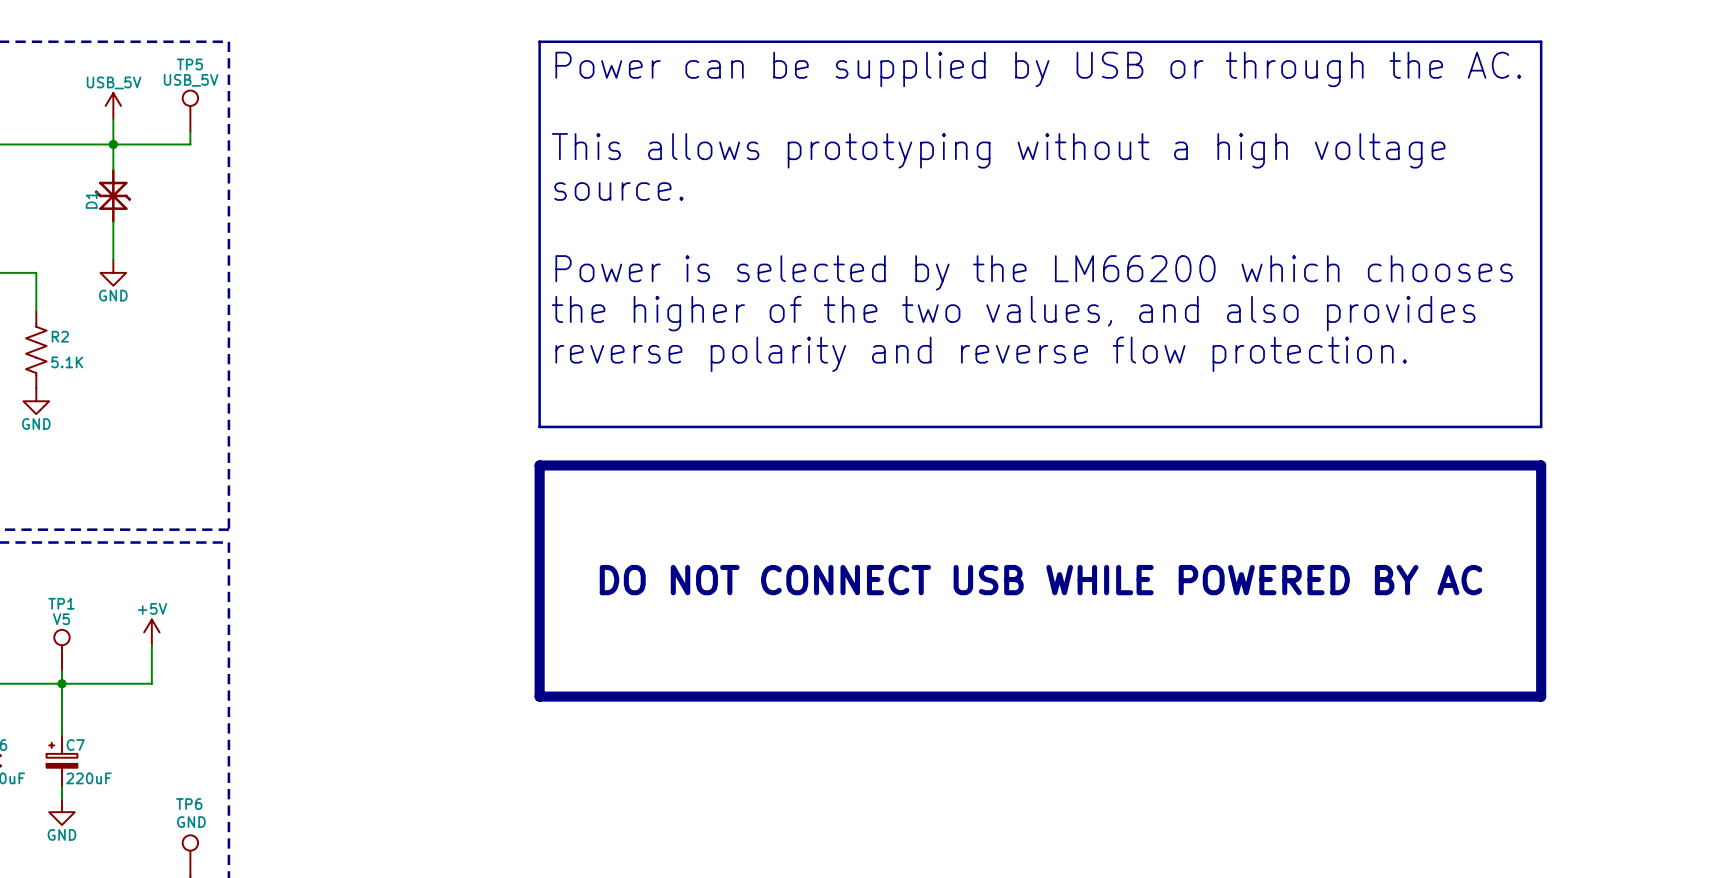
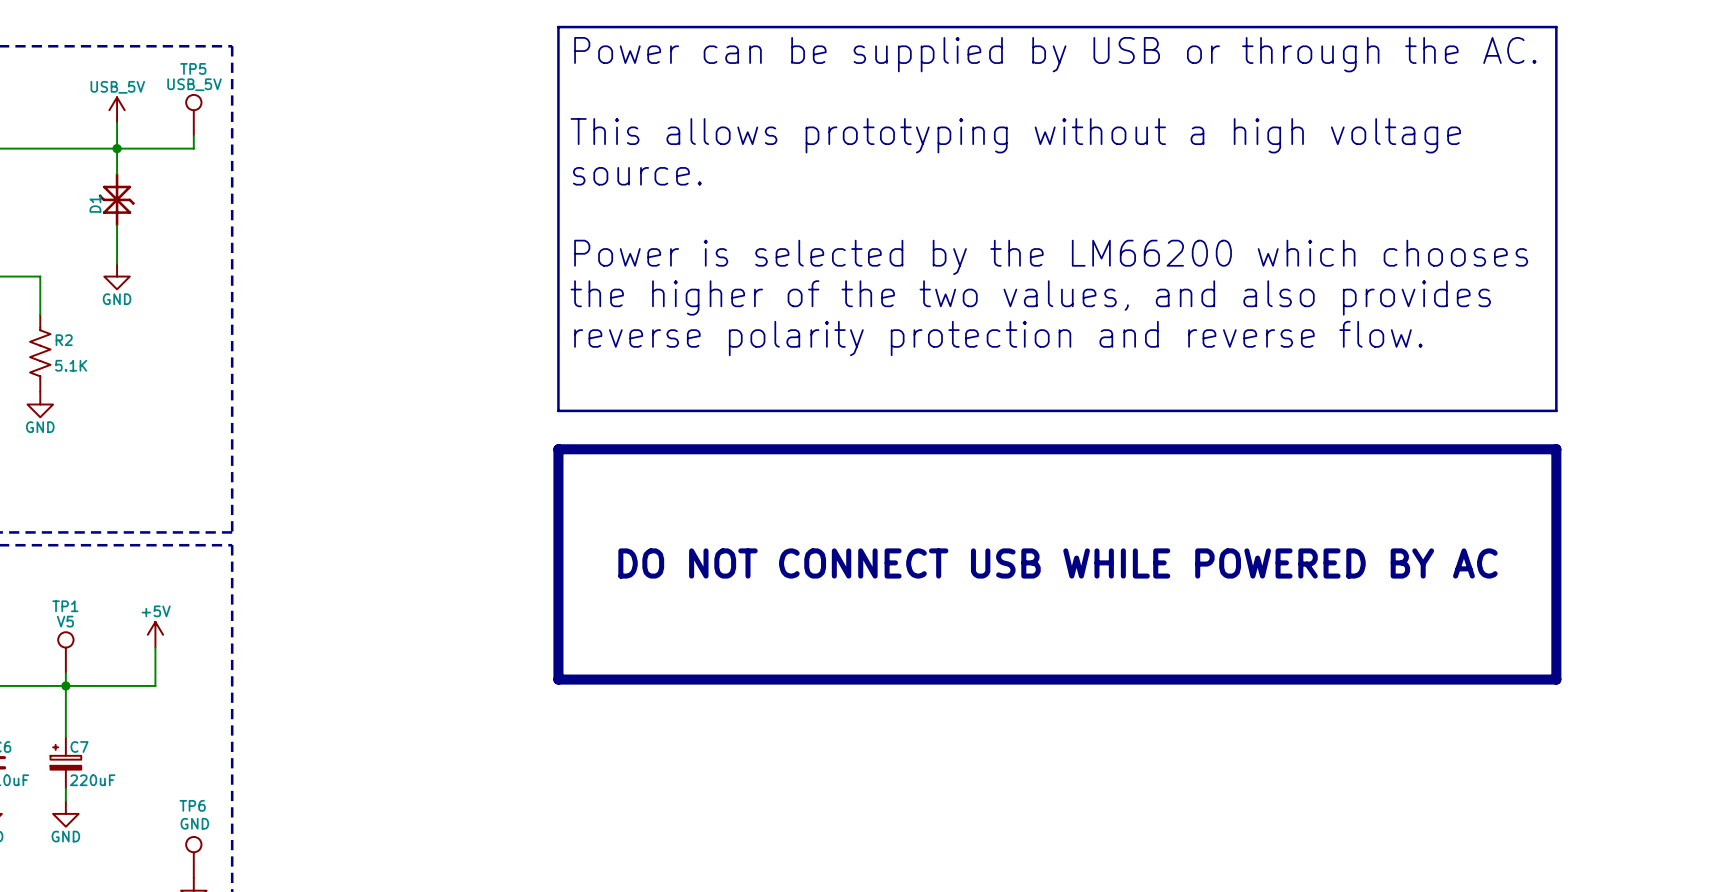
line: (539, 41) (1541, 41) (1541, 426) (539, 426) (539, 41) -> (558, 27) (1556, 27) (1556, 410) (558, 410) (558, 27)
text position: Power can be supplied by USB or through the AC. (1038, 69) -> Power can be supplied by USB or through the AC. (1055, 54)
text position: This allows prototyping without a high voltage (998, 150) -> This allows prototyping without a high voltage (1015, 135)
text position: source. (618, 191) -> source. (637, 176)
text position: Power is selected by the LM66200 which chooses (1034, 272) -> Power is selected by the LM66200 which chooses (1051, 257)
text position: the higher of the two values, and also provides (1013, 313) -> the higher of the two values, and also provides (1030, 297)
text: reverse polarity and reverse flow protection. (981, 354) -> reverse polarity protection and reverse flow. (998, 338)
line: (539, 465) (1541, 465) (1541, 696) (539, 696) (539, 465) -> (558, 449) (1556, 449) (1556, 679) (558, 679) (558, 449)
text position: DO NOT CONNECT USB WHILE POWERED BY AC (1041, 580) -> DO NOT CONNECT USB WHILE POWERED BY AC (1057, 563)

